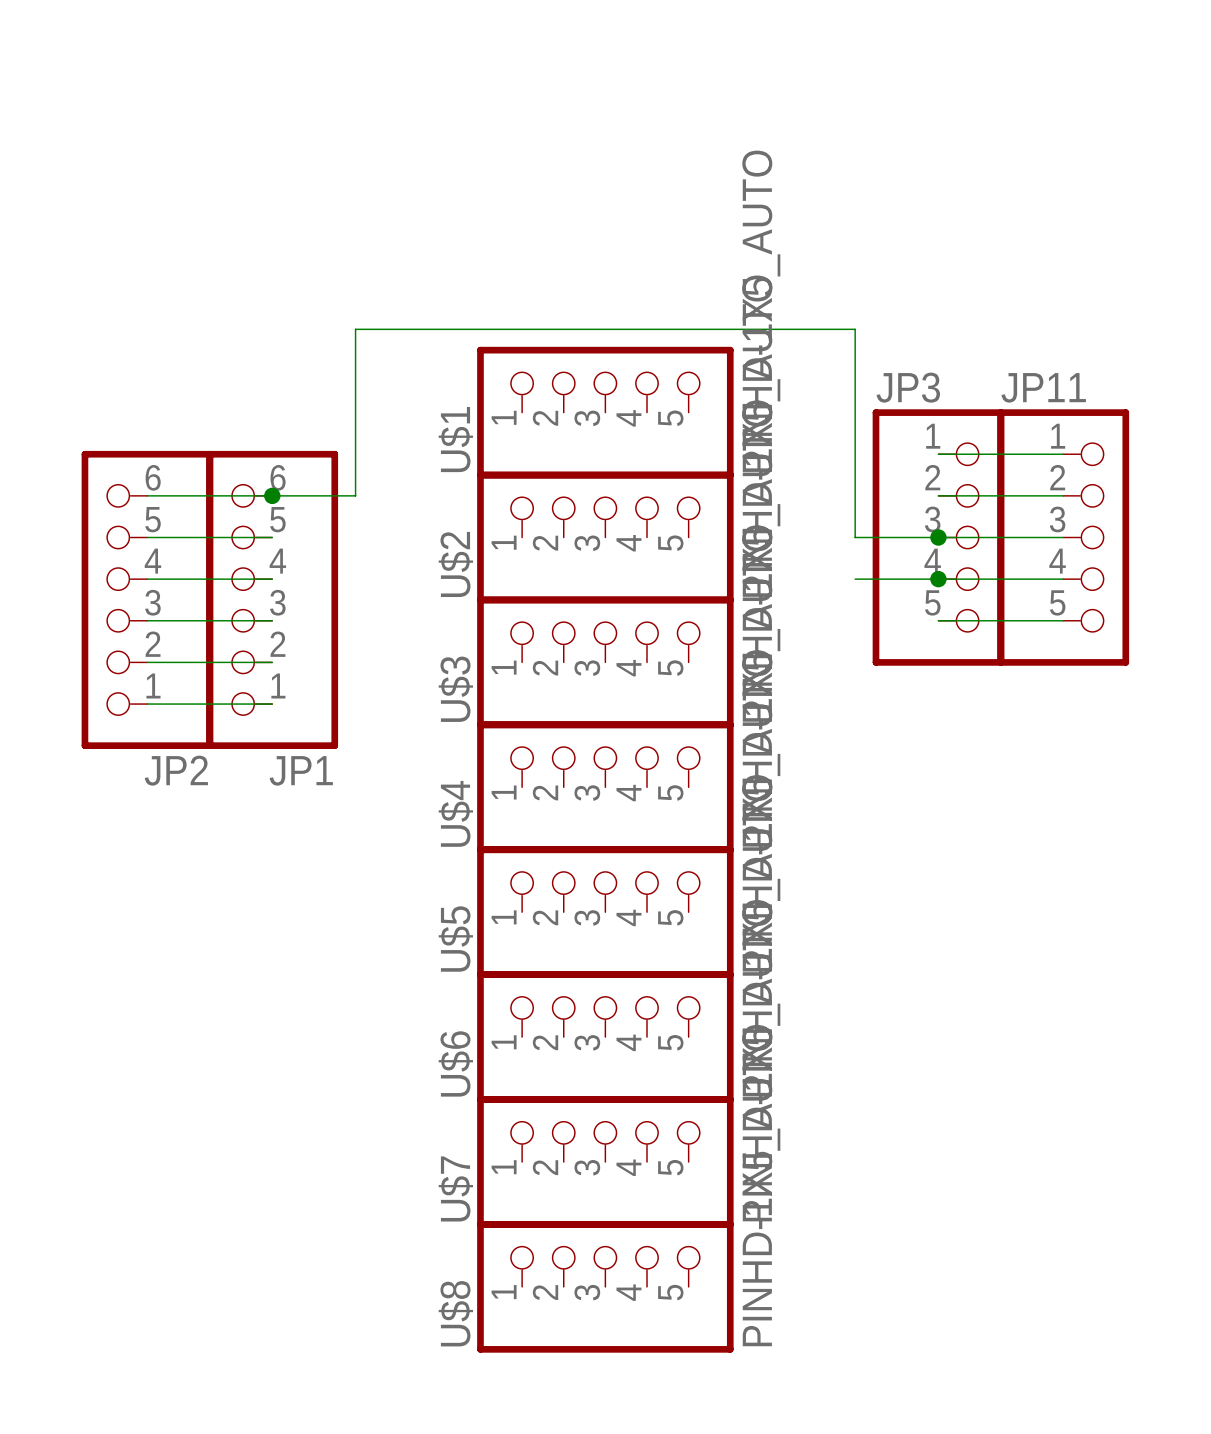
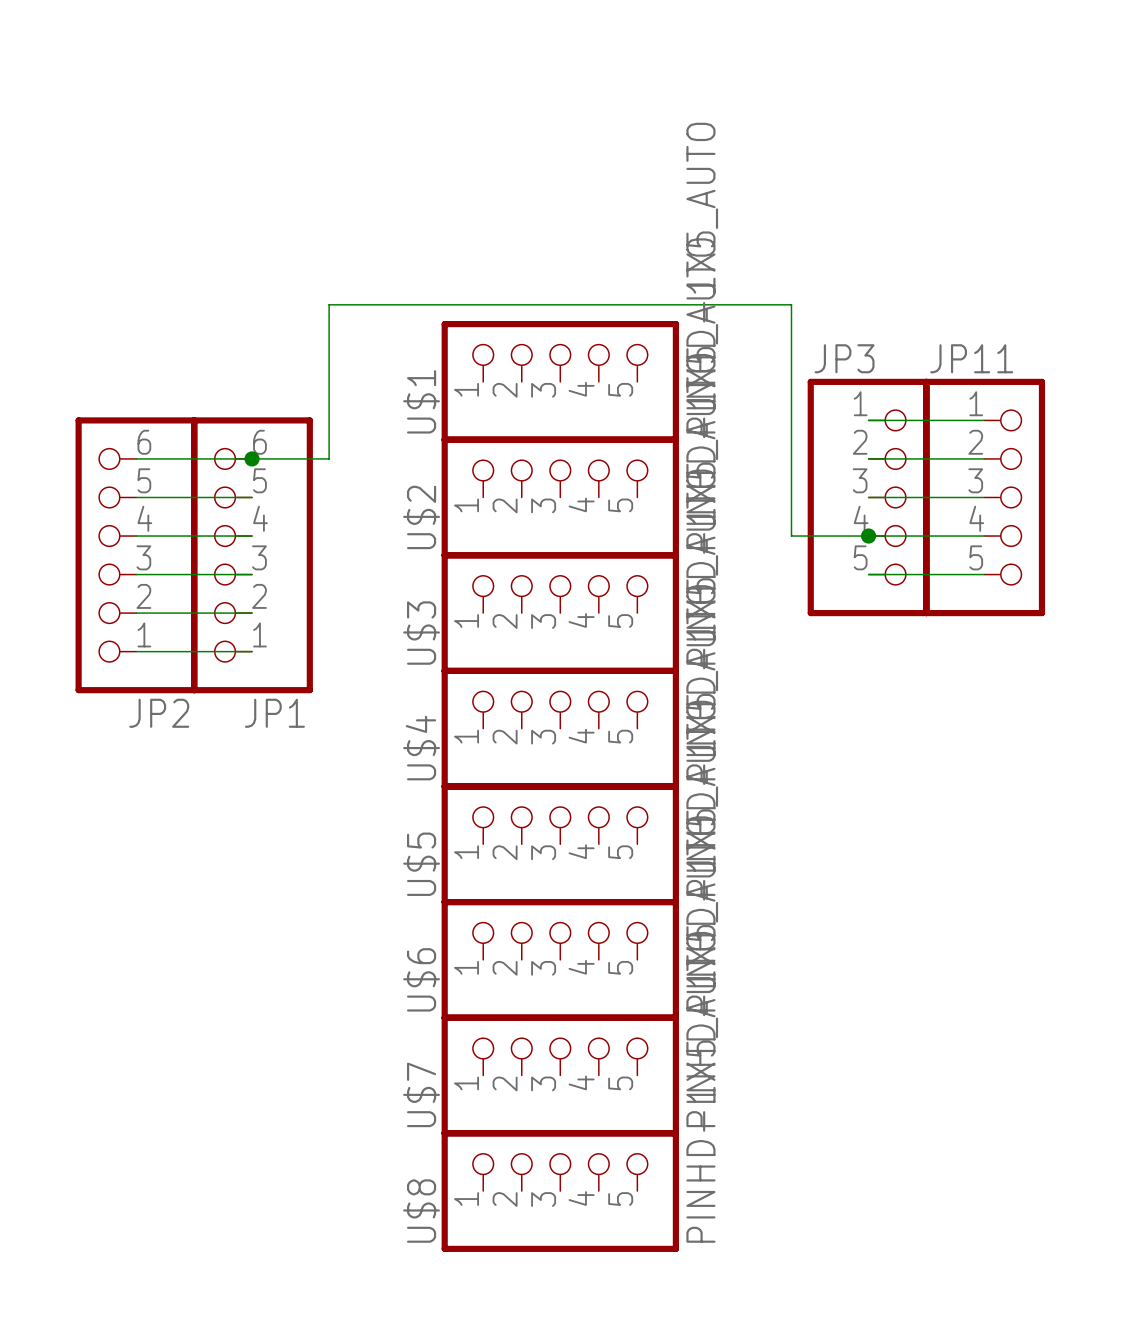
wire: (855, 537) (938, 537) -> (791, 497) (791, 536)
junction: (938, 537) -> none

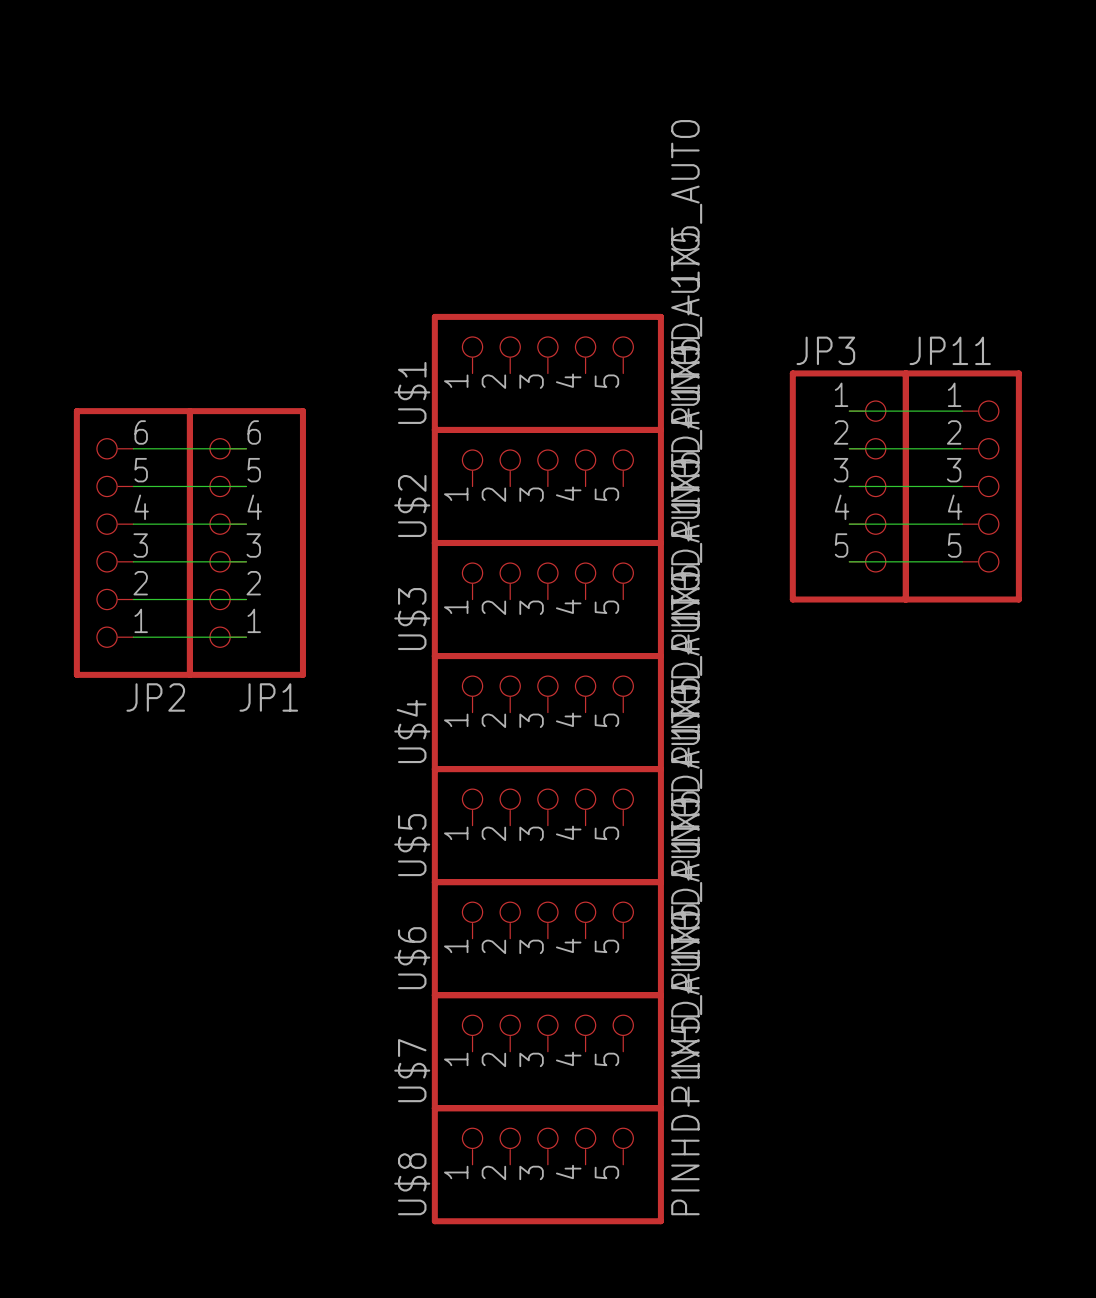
wire: (252, 458) (329, 458) (329, 304) (791, 304) (791, 536) (868, 536) -> none
junction: (252, 458) -> none
junction: (868, 536) -> none

